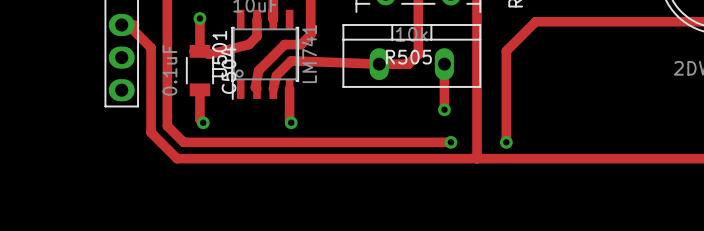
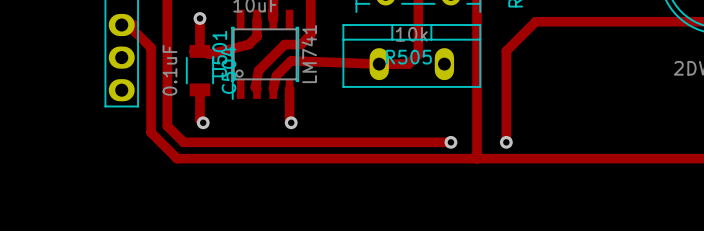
track: (444, 64) (444, 109) -> none
via: (444, 109) -> none

